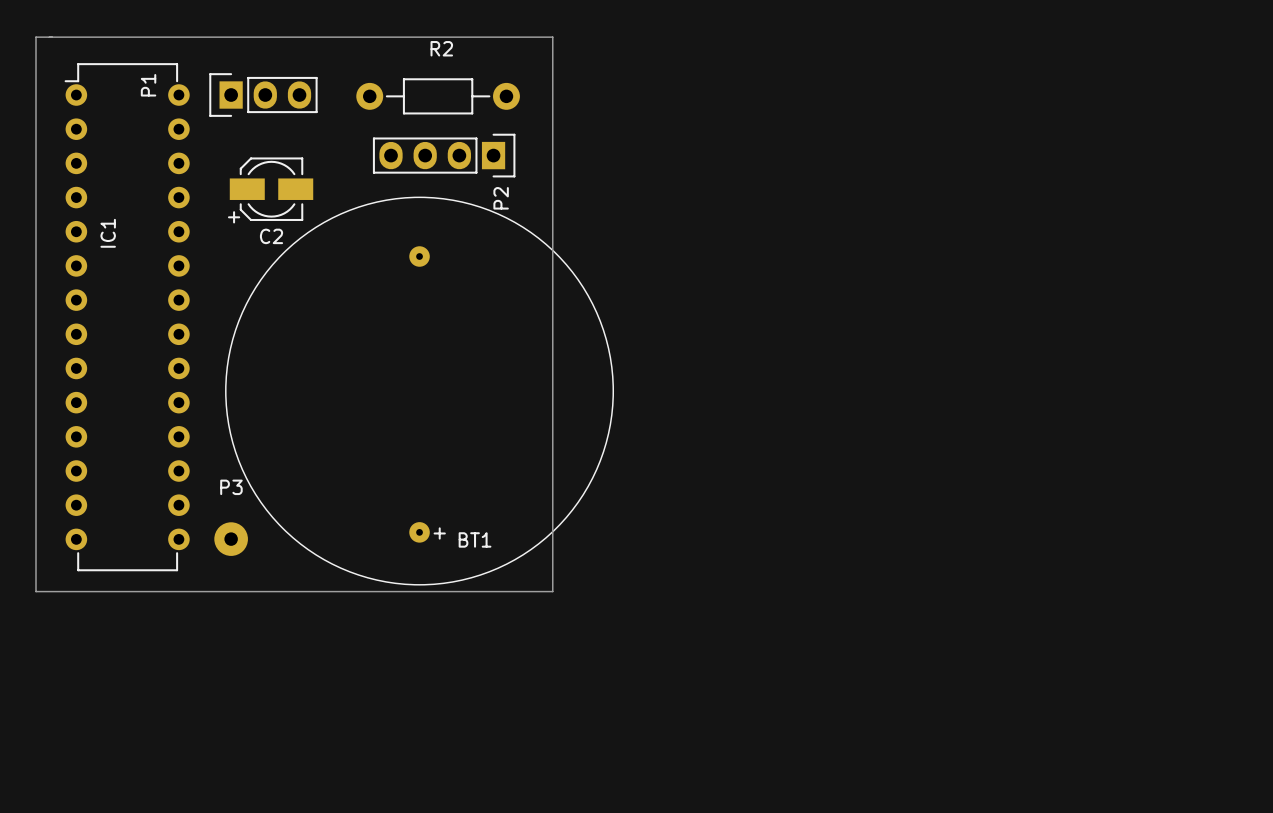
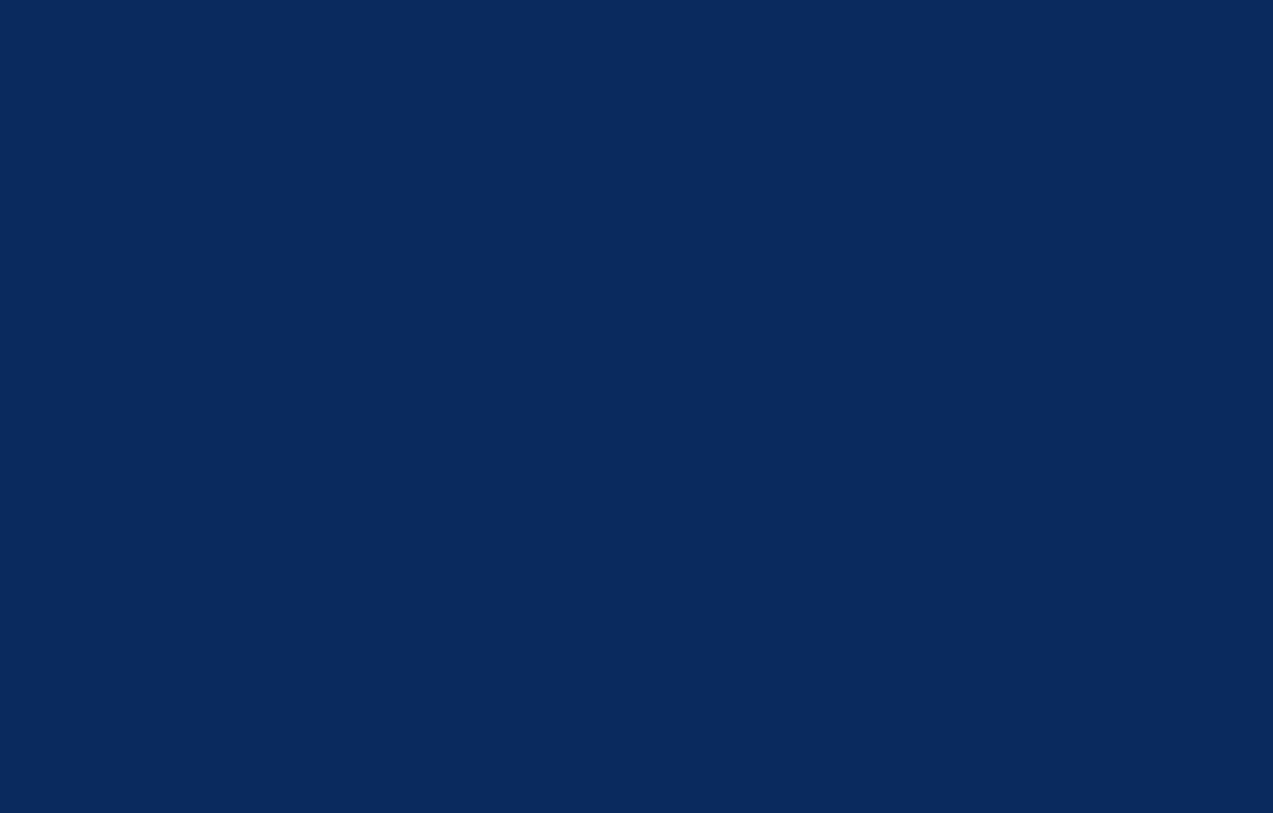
board edge: (36, 37) (552, 37) (552, 591) (36, 591) (36, 37) -> none
P1: (263, 95) -> none
R2: (438, 96) -> none
P2: (444, 155) -> none
C2: (271, 189) -> none
IC1: (127, 317) -> none
BT1: (419, 391) -> none
P3: (231, 539) -> none

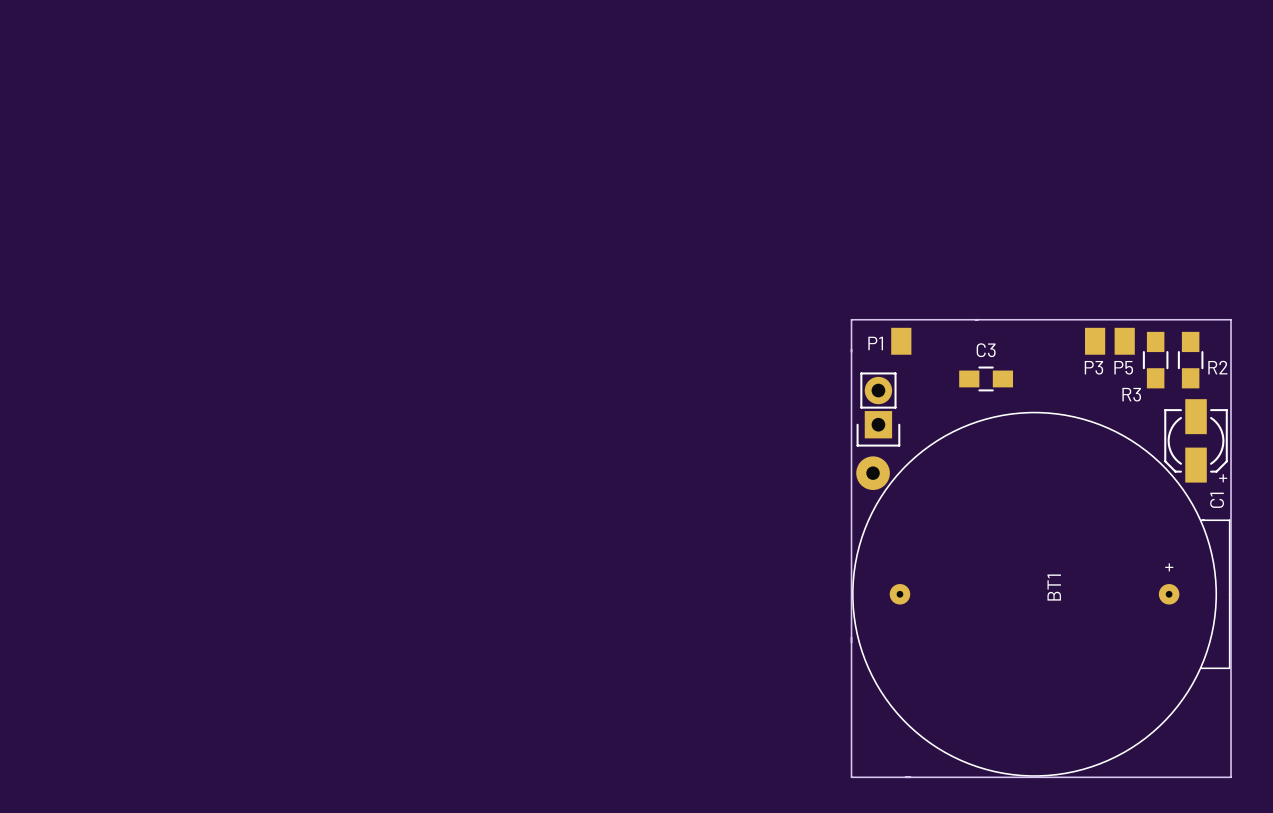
board edge: none -> (851, 319) (1231, 319) (1231, 777) (851, 777) (851, 319)
P1: none -> (901, 341)
P3: none -> (1095, 341)
P5: none -> (1124, 341)
R3: none -> (1155, 360)
R2: none -> (1190, 360)
C3: none -> (986, 378)
part: none -> (878, 409)
C1: none -> (1196, 440)
part: none -> (873, 473)
BT1: none -> (1041, 594)

